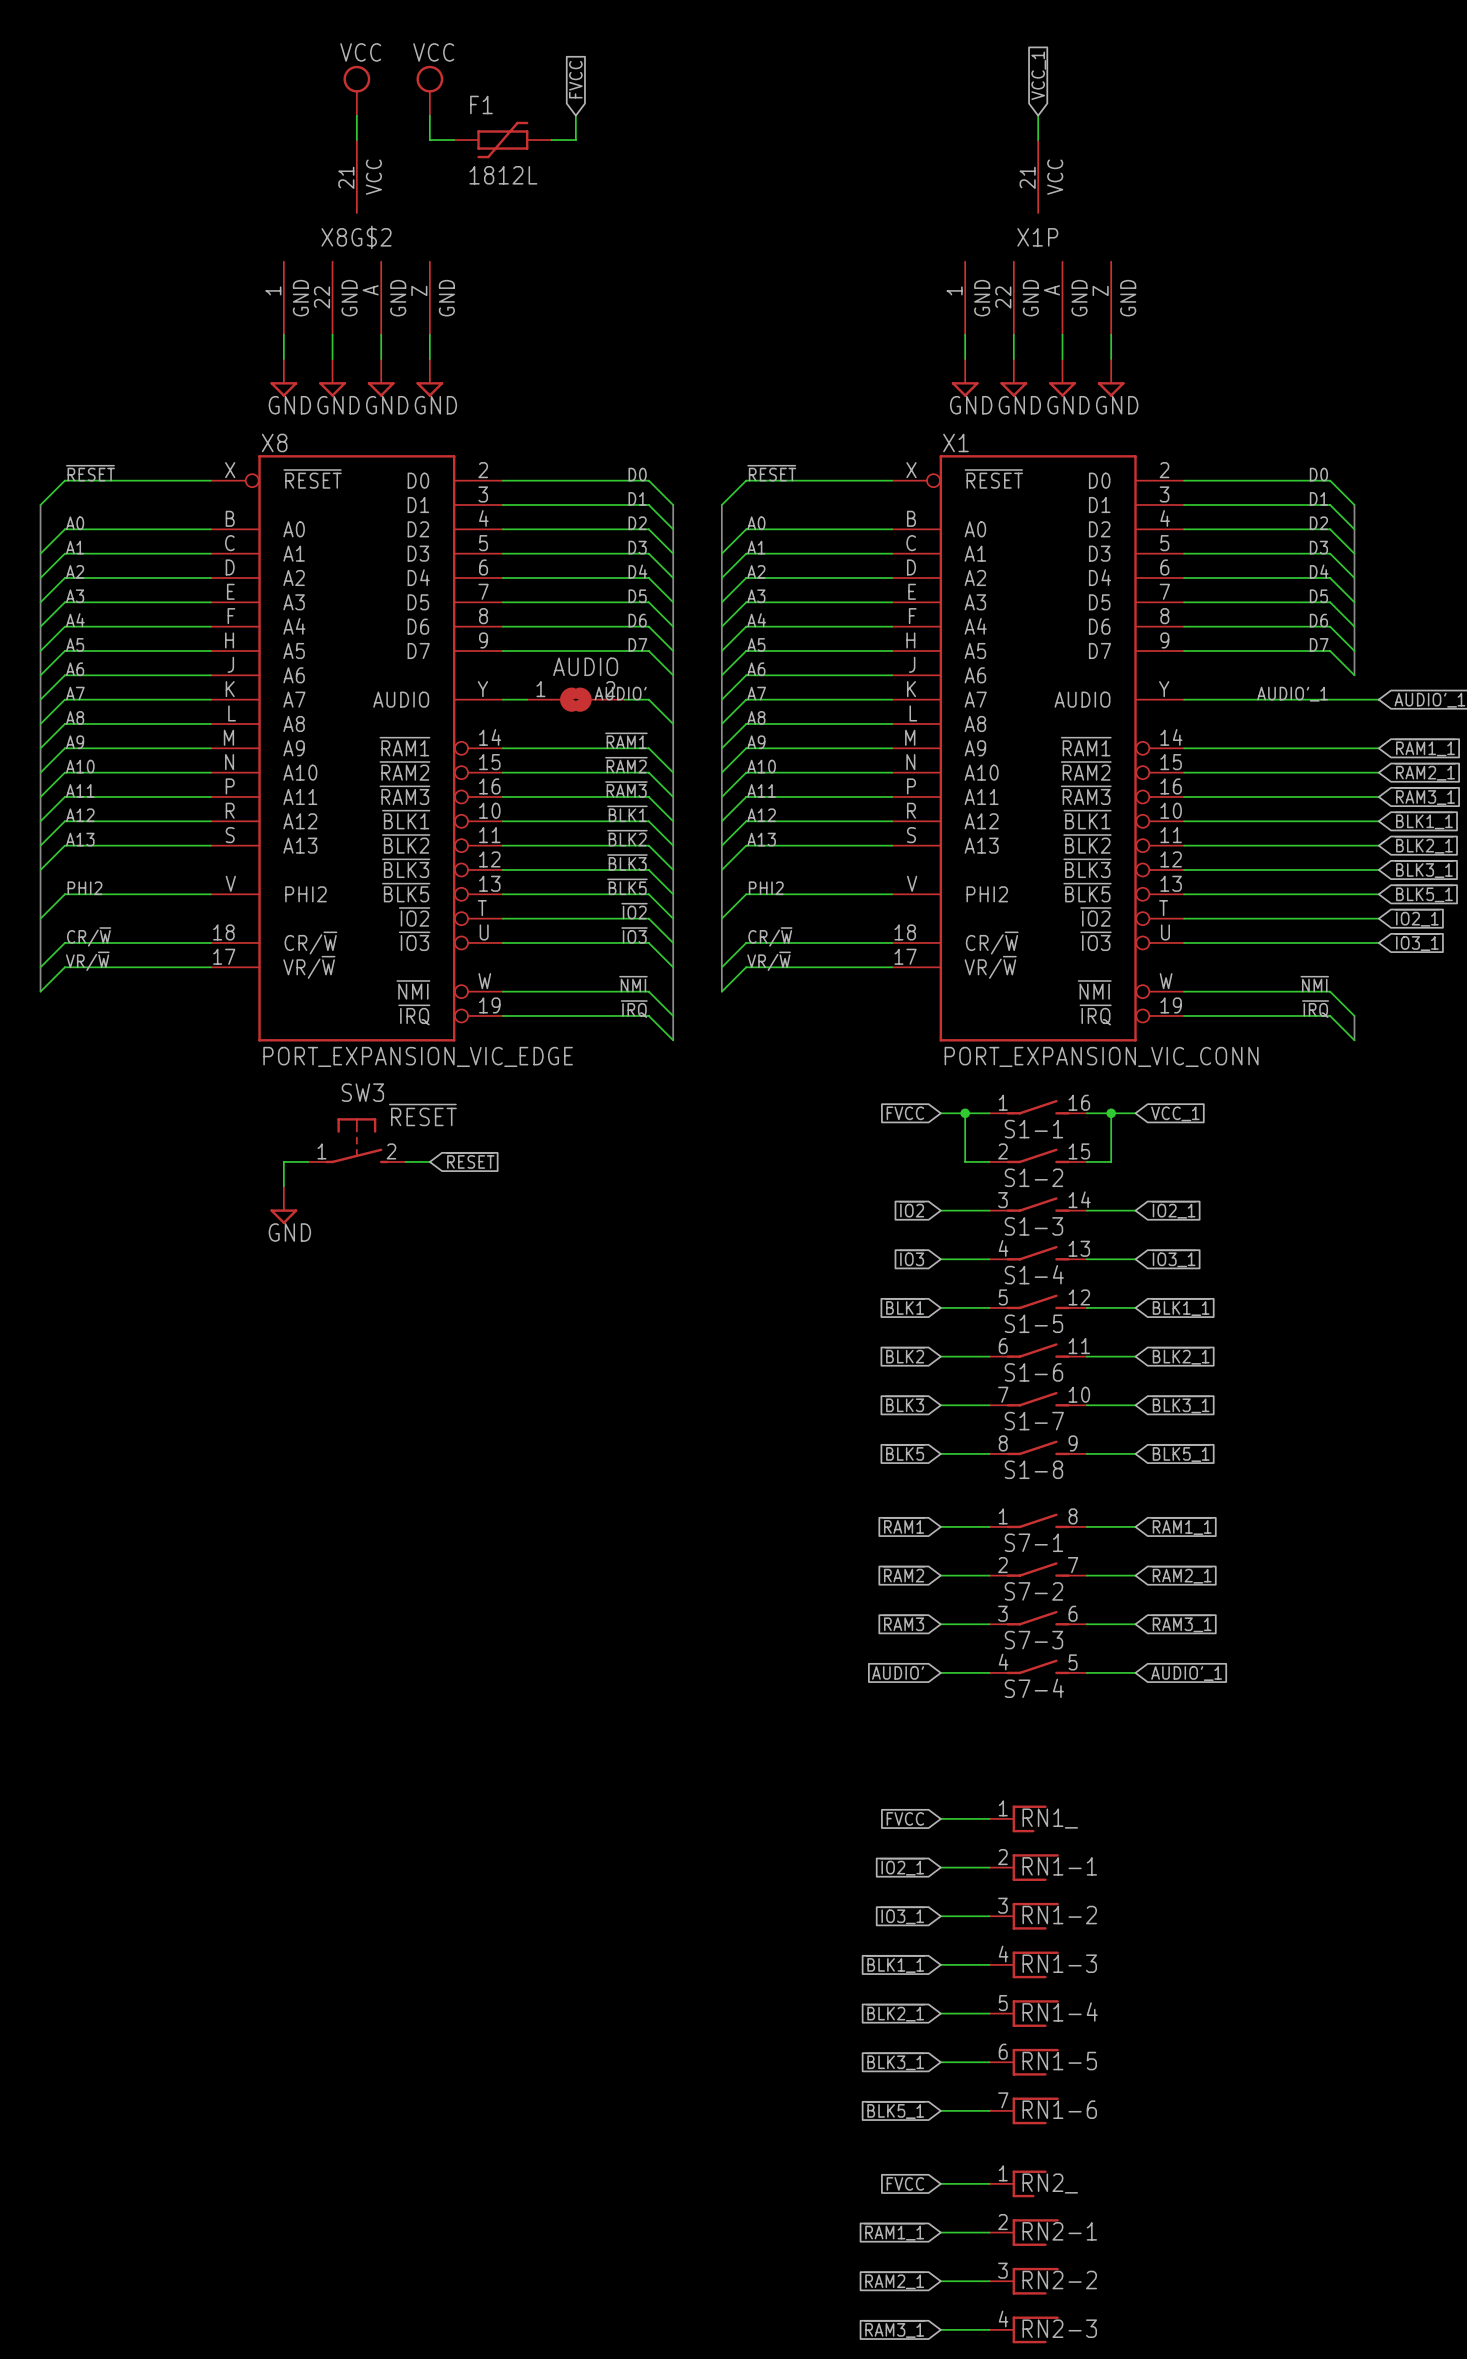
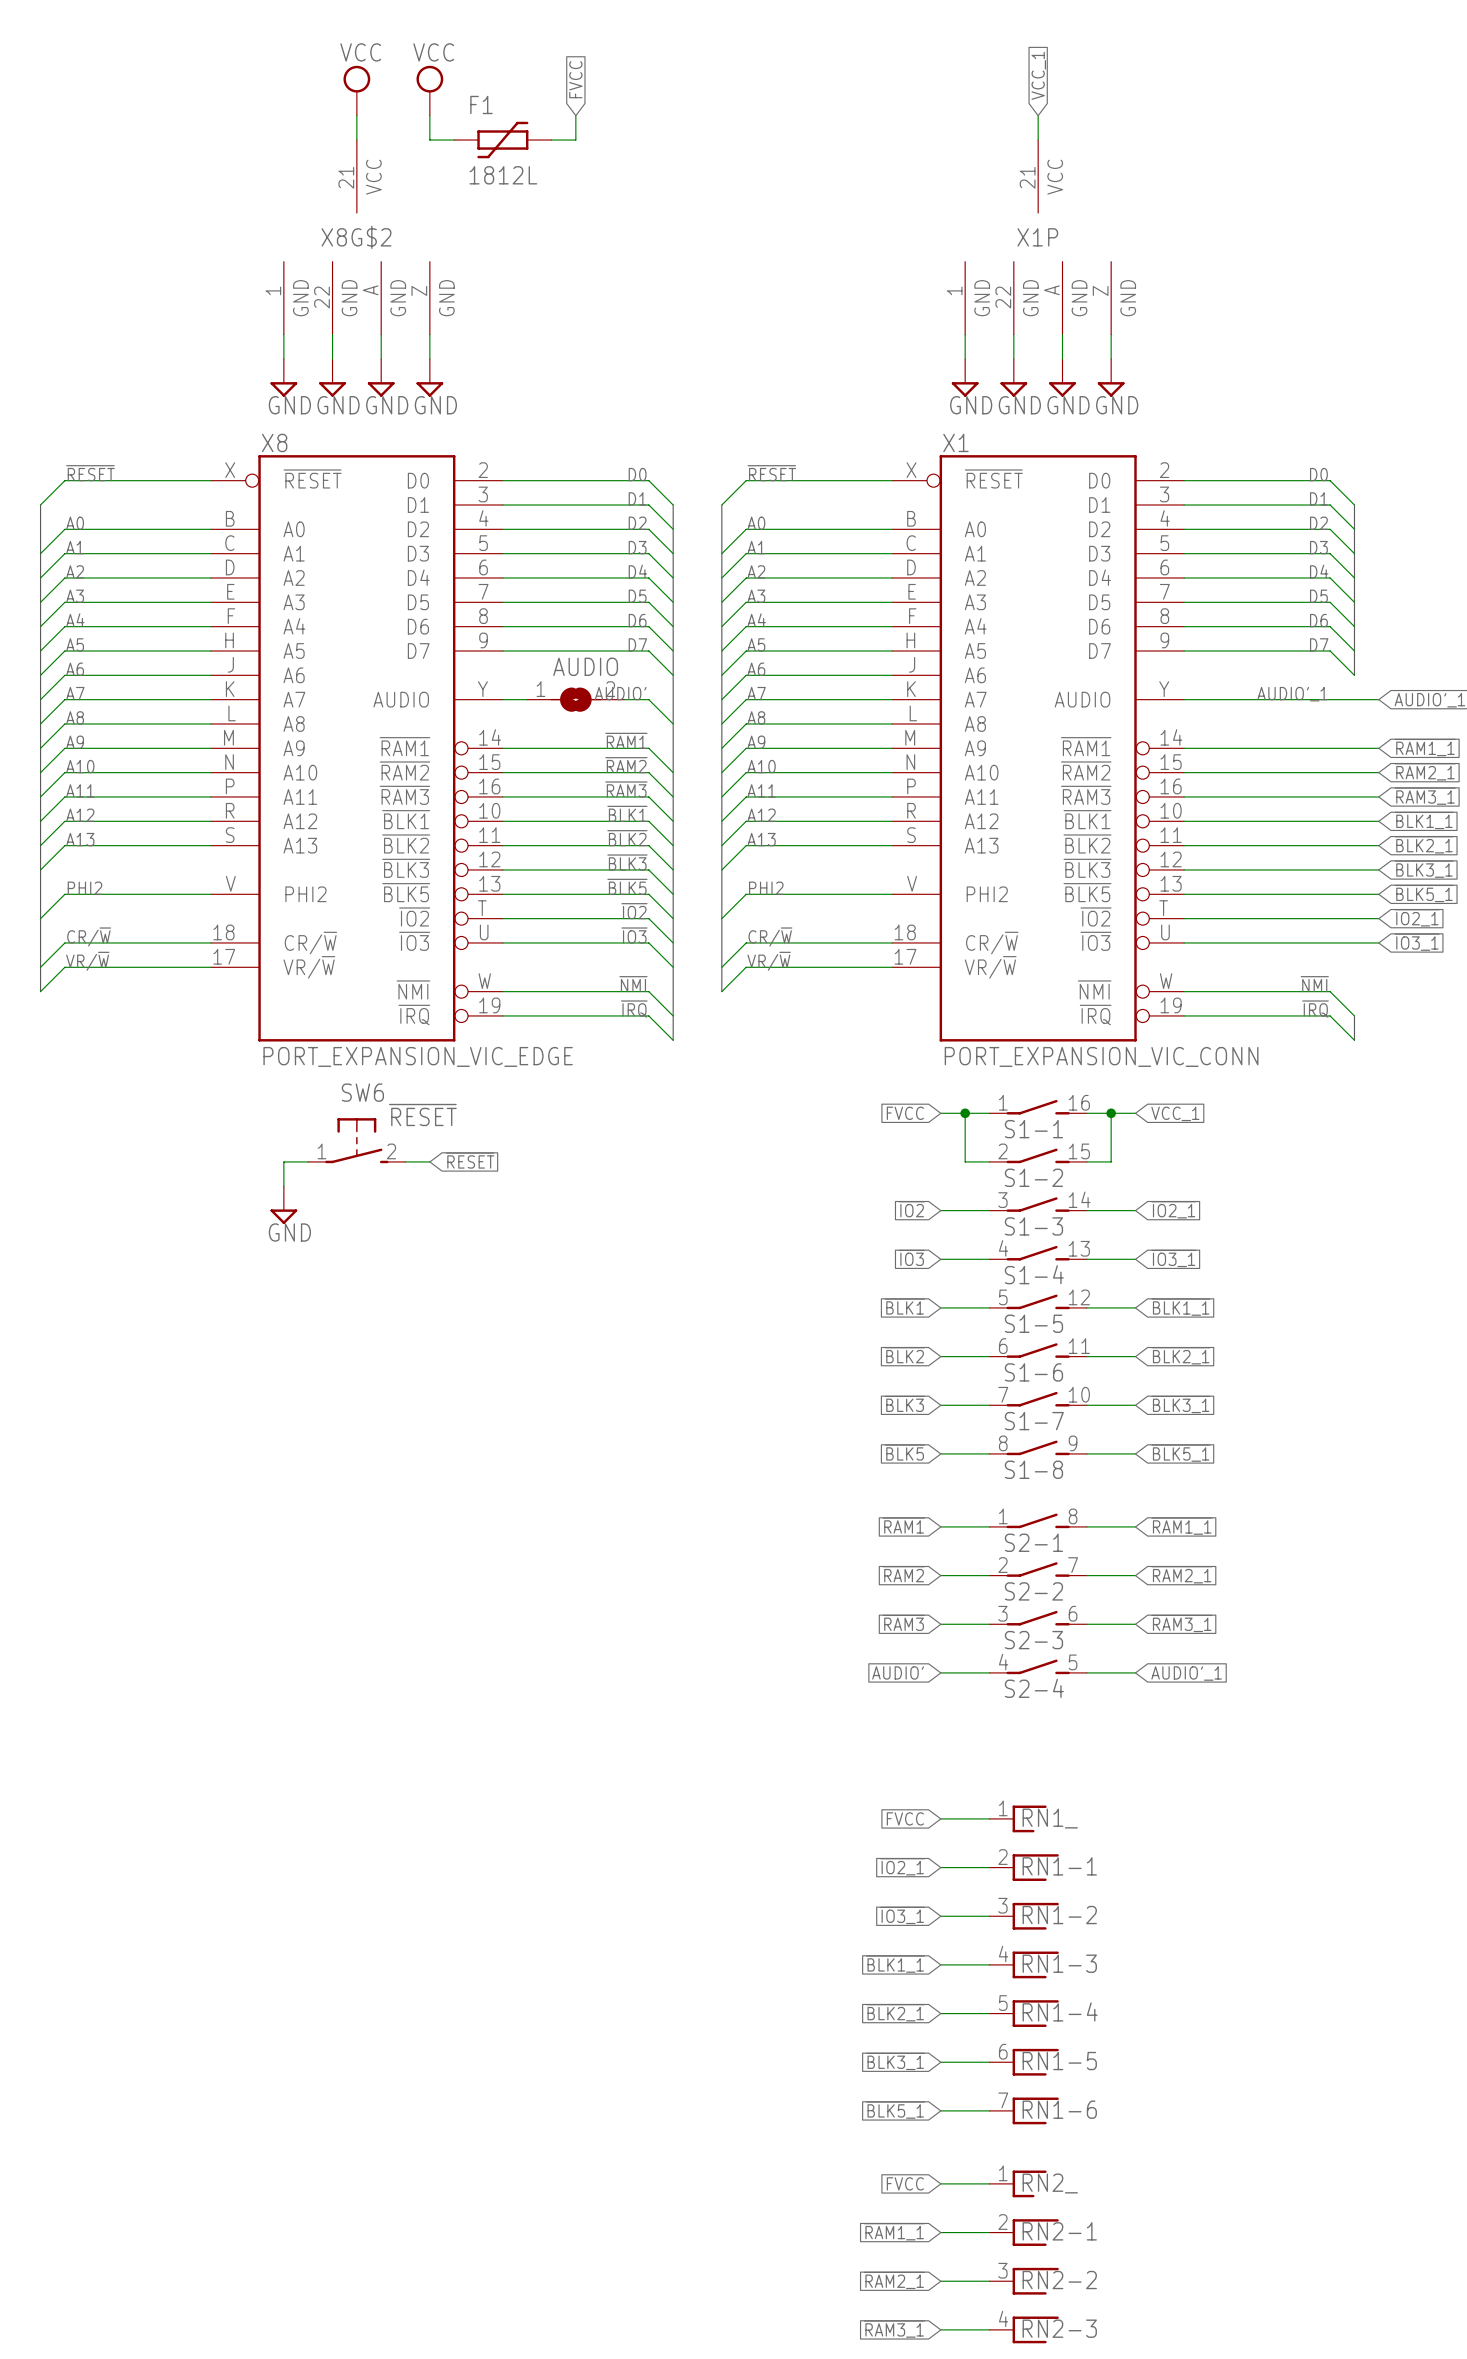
SW3 name: SW3 (362, 1092) -> SW6 (362, 1092)
S7-1 name: S7-1 (1033, 1542) -> S2-1 (1033, 1542)
S7-2 name: S7-2 (1033, 1591) -> S2-2 (1033, 1591)
S7-3 name: S7-3 (1033, 1640) -> S2-3 (1033, 1640)
S7-4 name: S7-4 (1034, 1688) -> S2-4 (1034, 1688)

